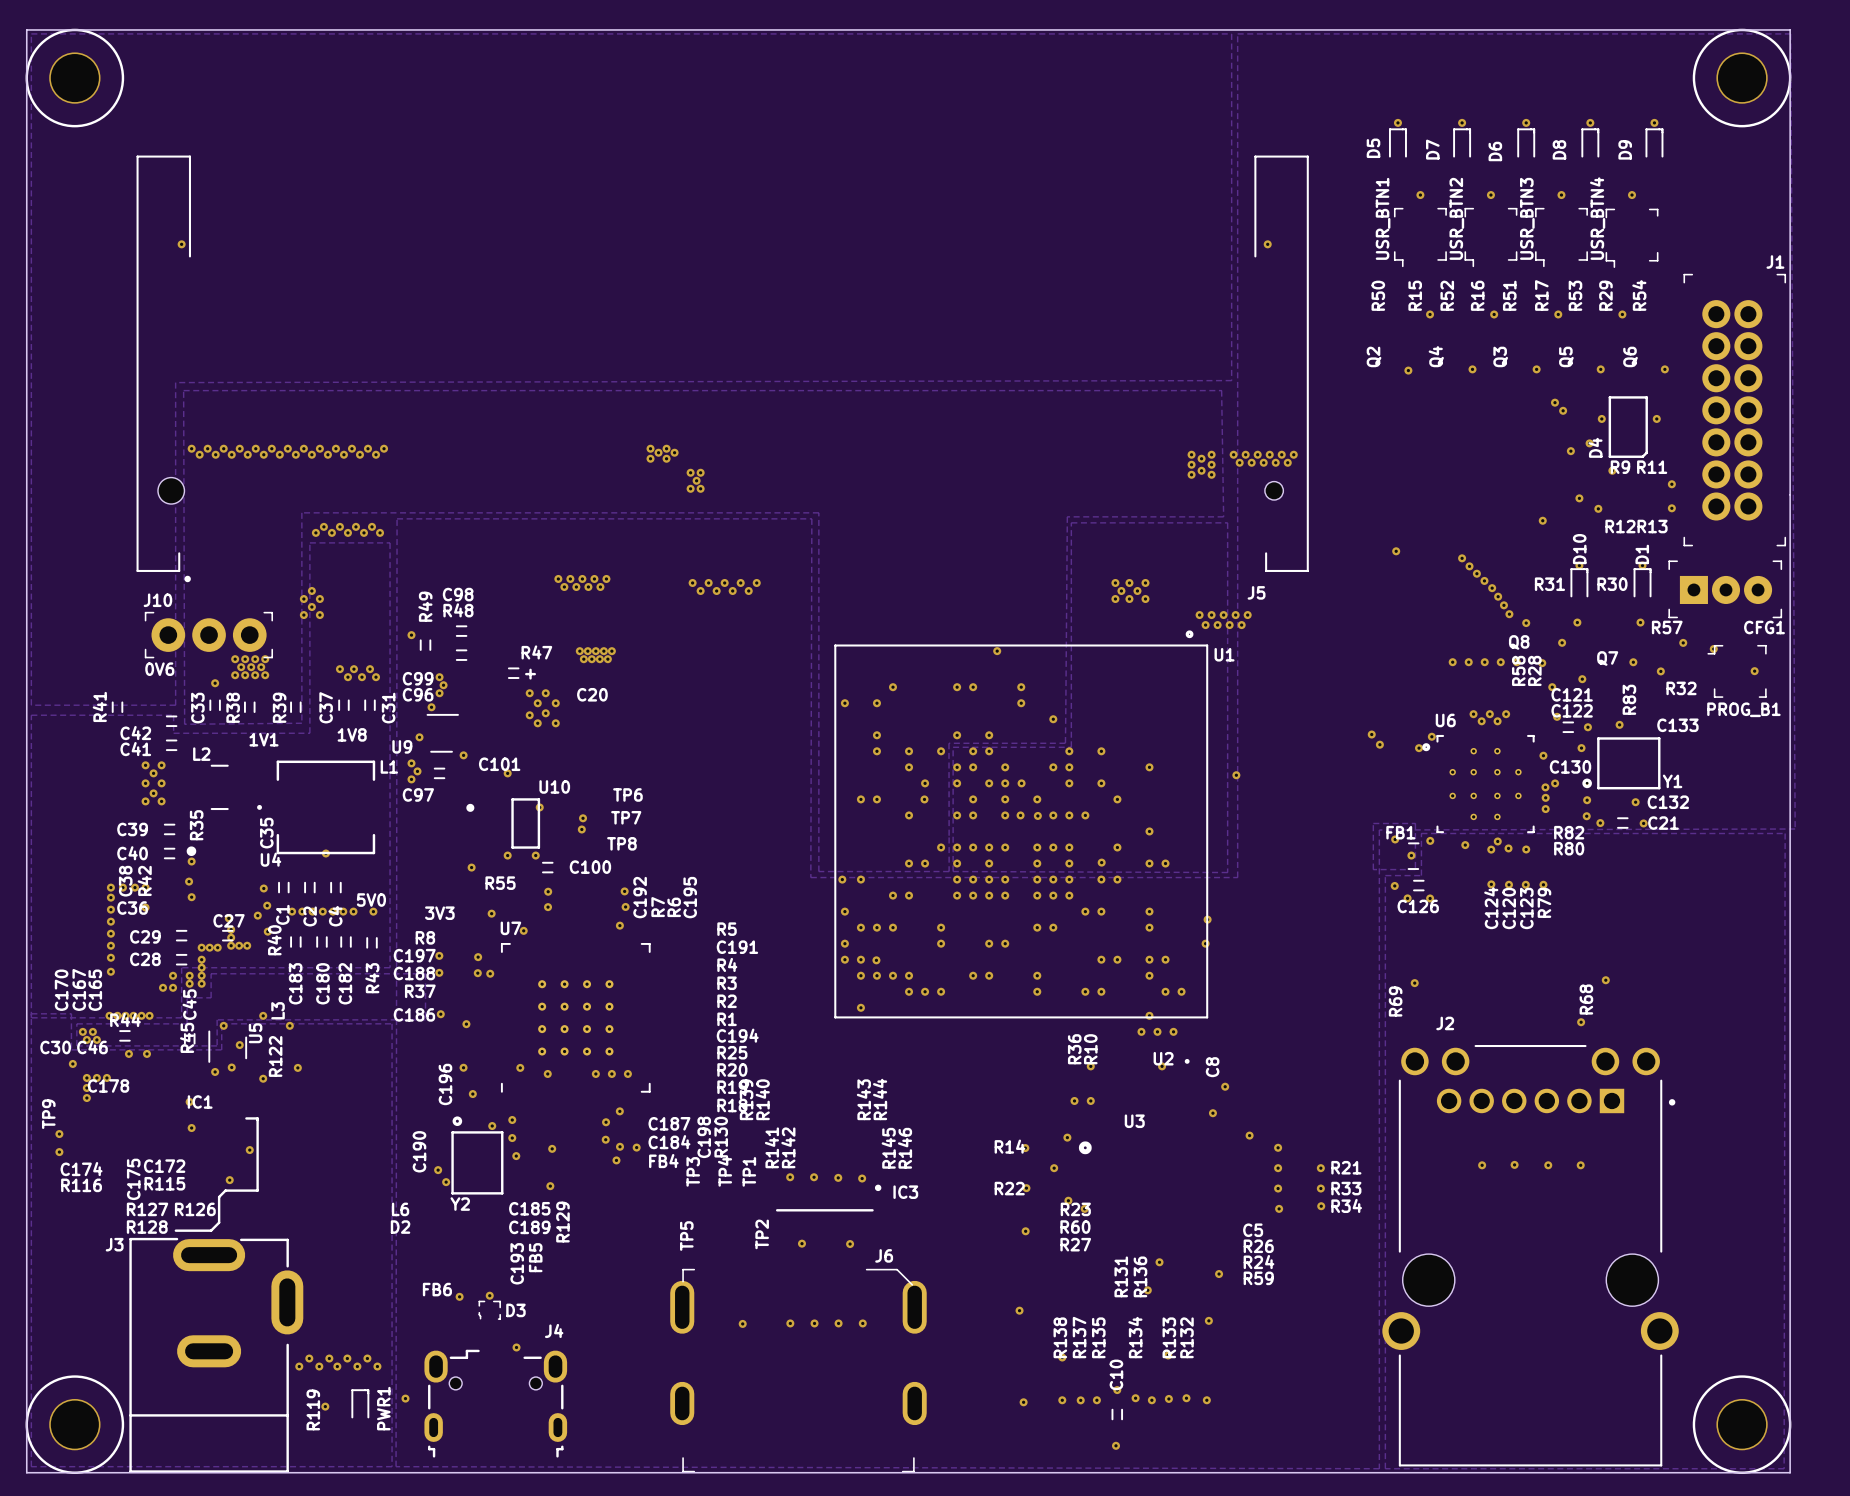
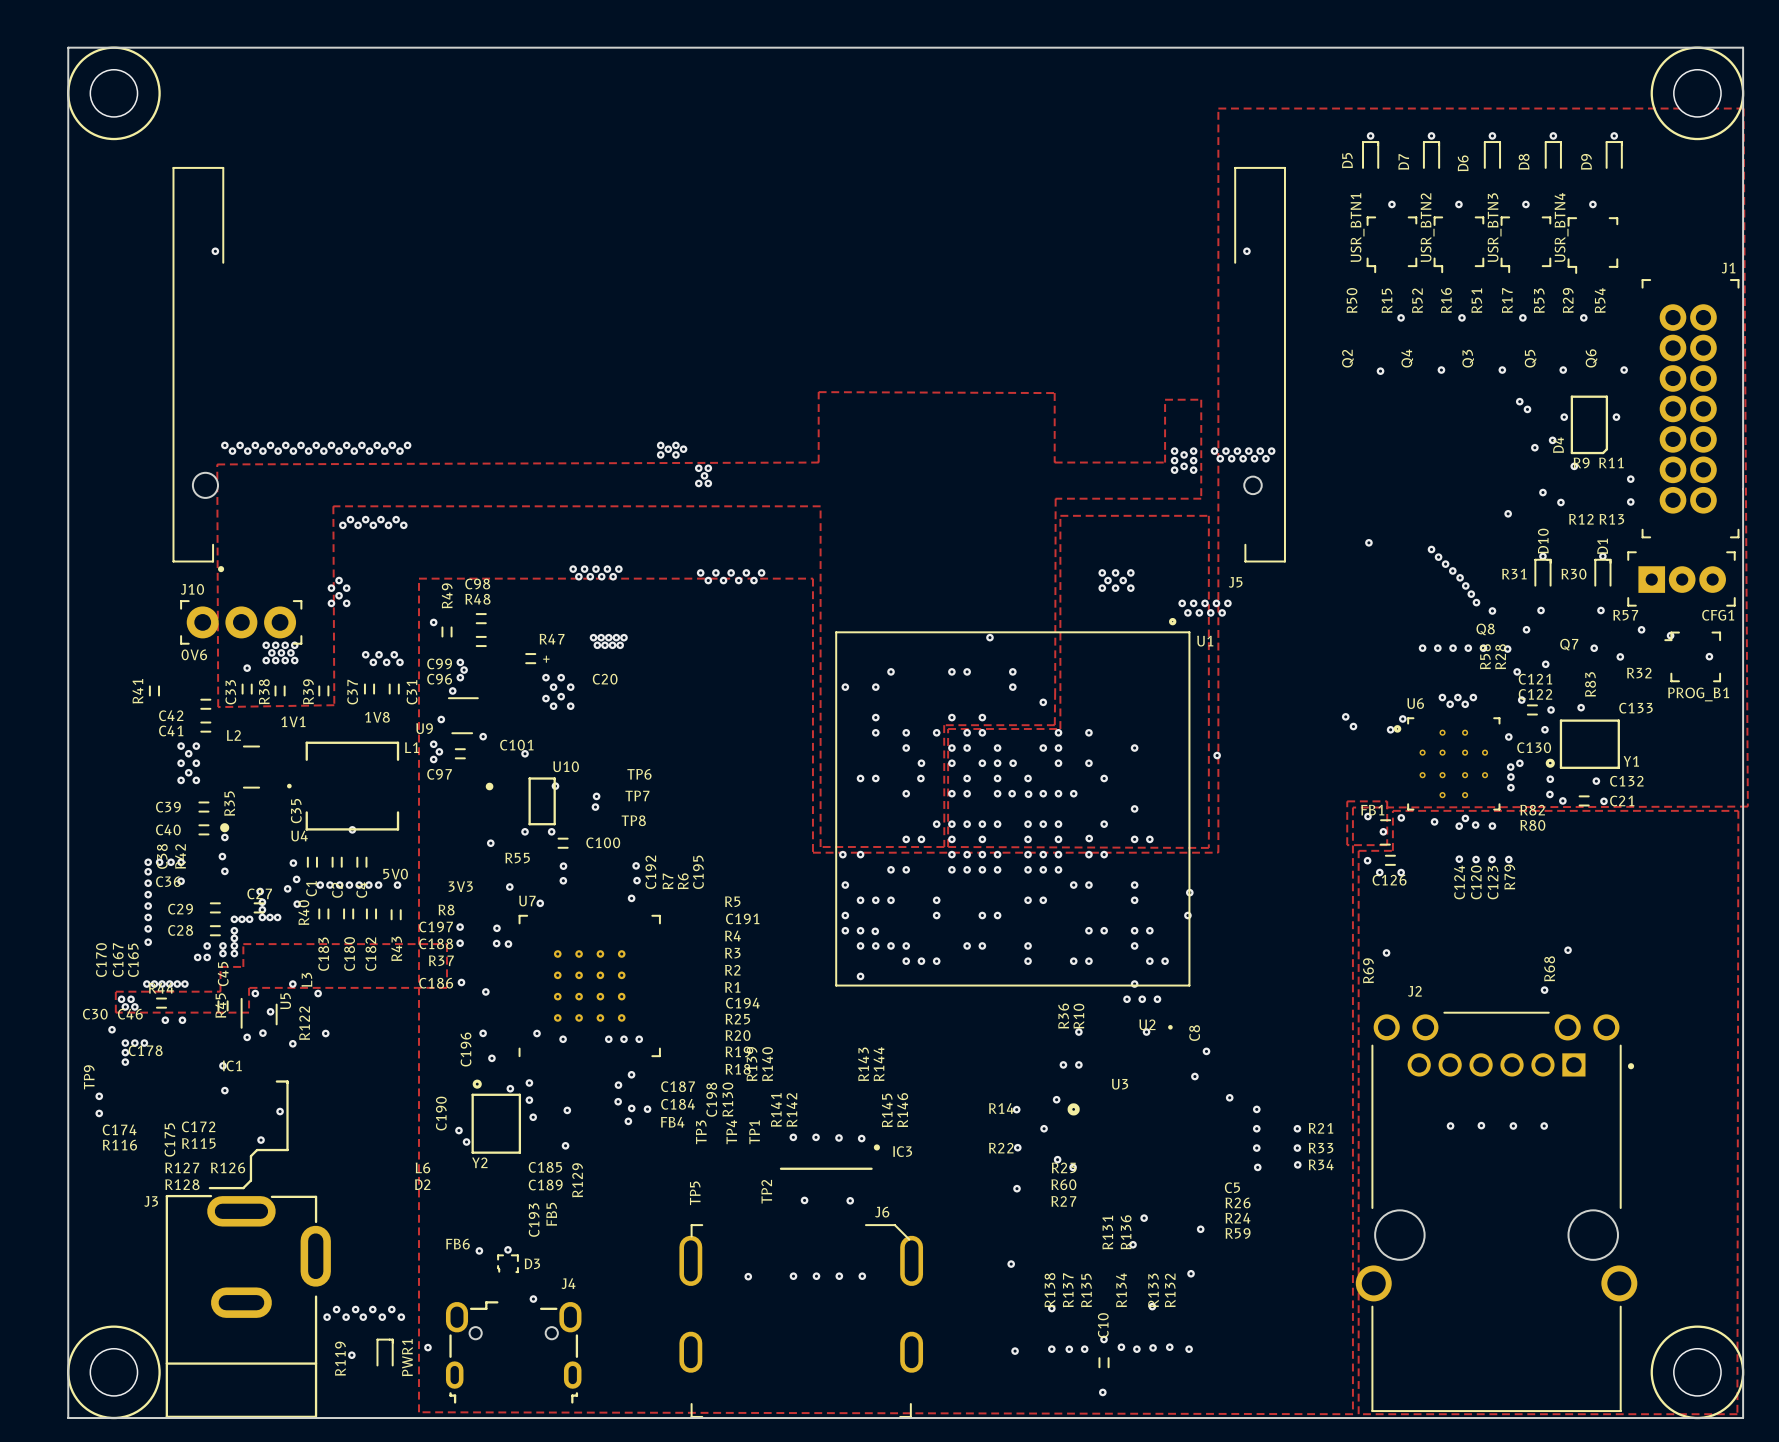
zone outline: (31, 33) (1231, 33) (1231, 380) (175, 382) (175, 705) (31, 705) (31, 33) -> none
zone outline: (1237, 94) (1237, 33) (1790, 33) (1795, 829) -> (1218, 108) (1743, 108) (1747, 806)
zone outline: (305, 512) (301, 512) (301, 723) (184, 724) (183, 390) (1221, 390) (1223, 516) (1067, 516) (1065, 708) -> (333, 506) (334, 705) (218, 707) (217, 464) (818, 462) (818, 392) (1054, 393) (1054, 462) (1165, 462) (1165, 399) (1201, 399) (1201, 498) (1055, 498) (1055, 691)
zone outline: (810, 877) (811, 518) (397, 518) (396, 1466) -> (812, 852) (812, 578) (419, 578) (419, 1412)
zone outline: (31, 1013) (71, 1013) (71, 1049) (221, 1049) (221, 1023) (392, 1023) (392, 1466) (31, 1466) (31, 715) (173, 715) (173, 733) (309, 733) (309, 542) (390, 542) (390, 967) (181, 967) (181, 1017) (31, 1017) -> none

